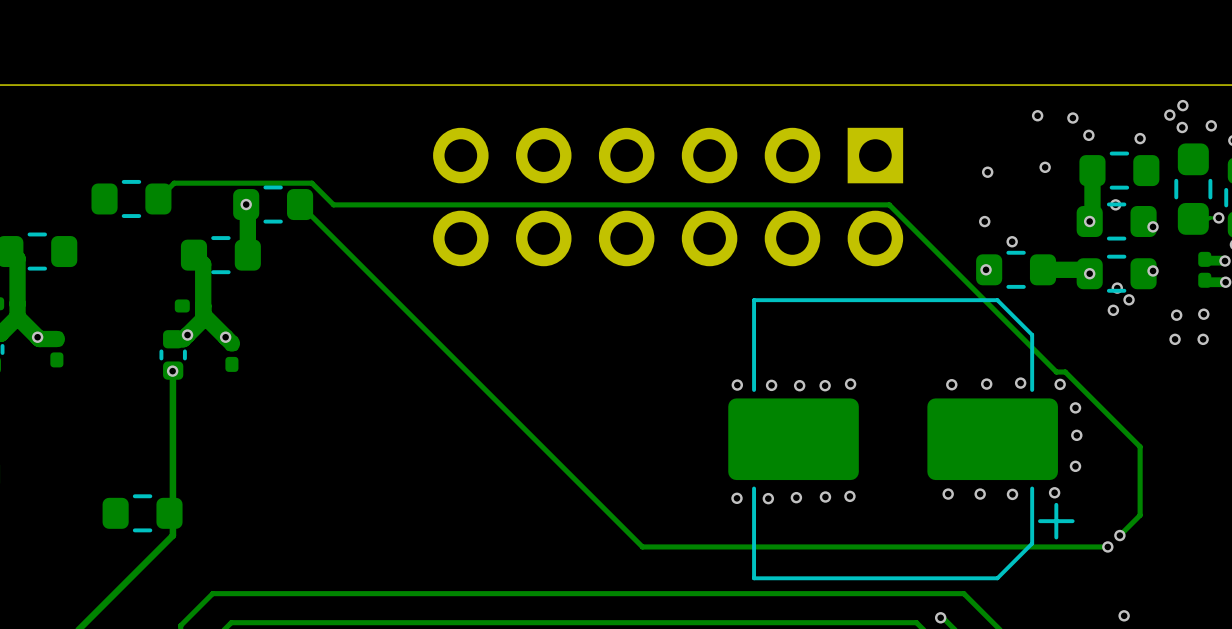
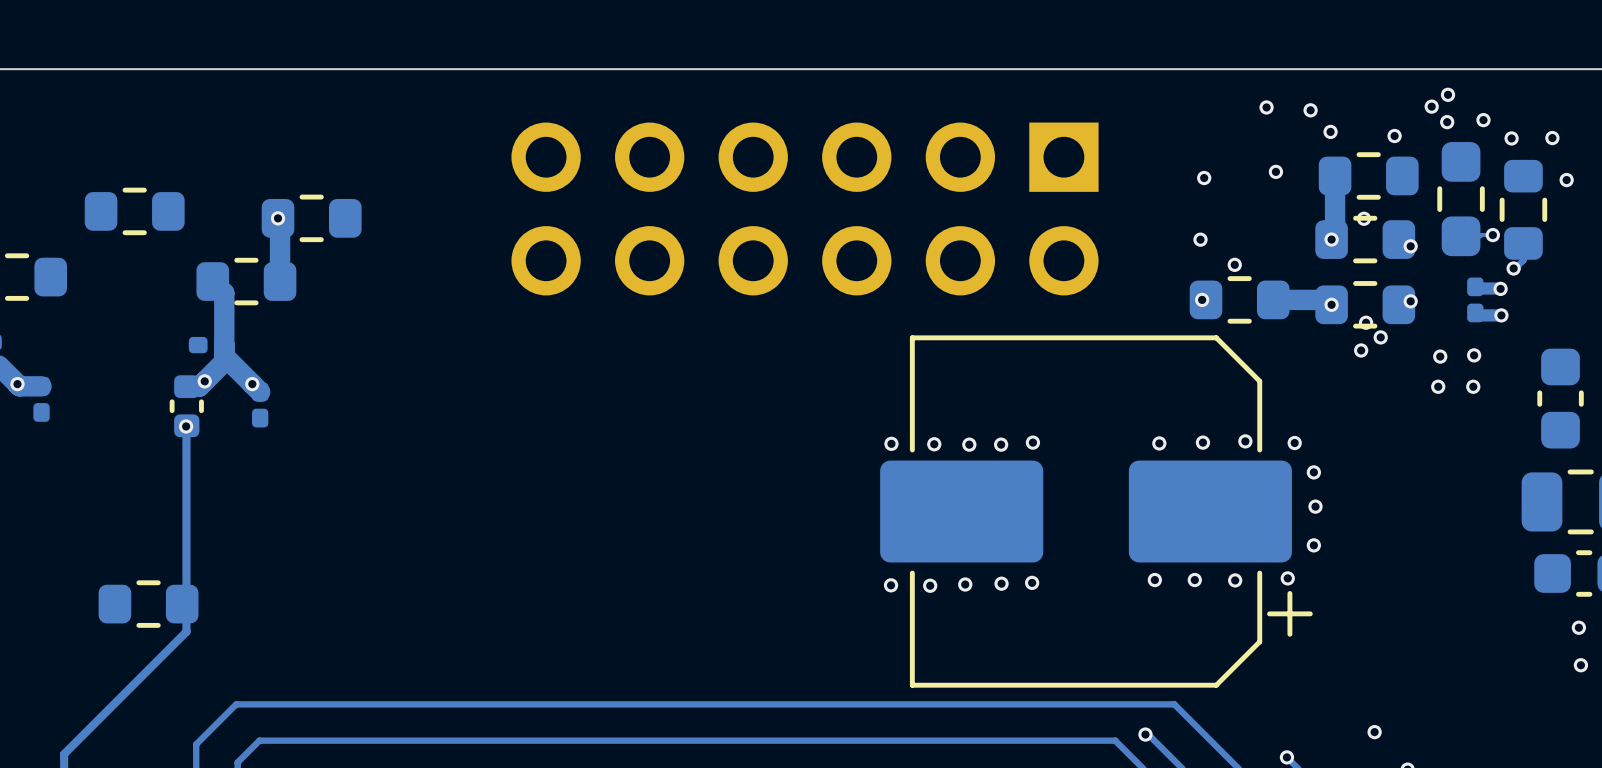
track: (158, 198) (174, 183) (311, 183) (333, 204) (889, 204) (1056, 372) (1065, 372) (1140, 446) (1140, 515) (1119, 535) -> none
track: (300, 204) (642, 546) (1107, 546) -> none
via: (1119, 535) -> none
via: (1107, 546) -> none

